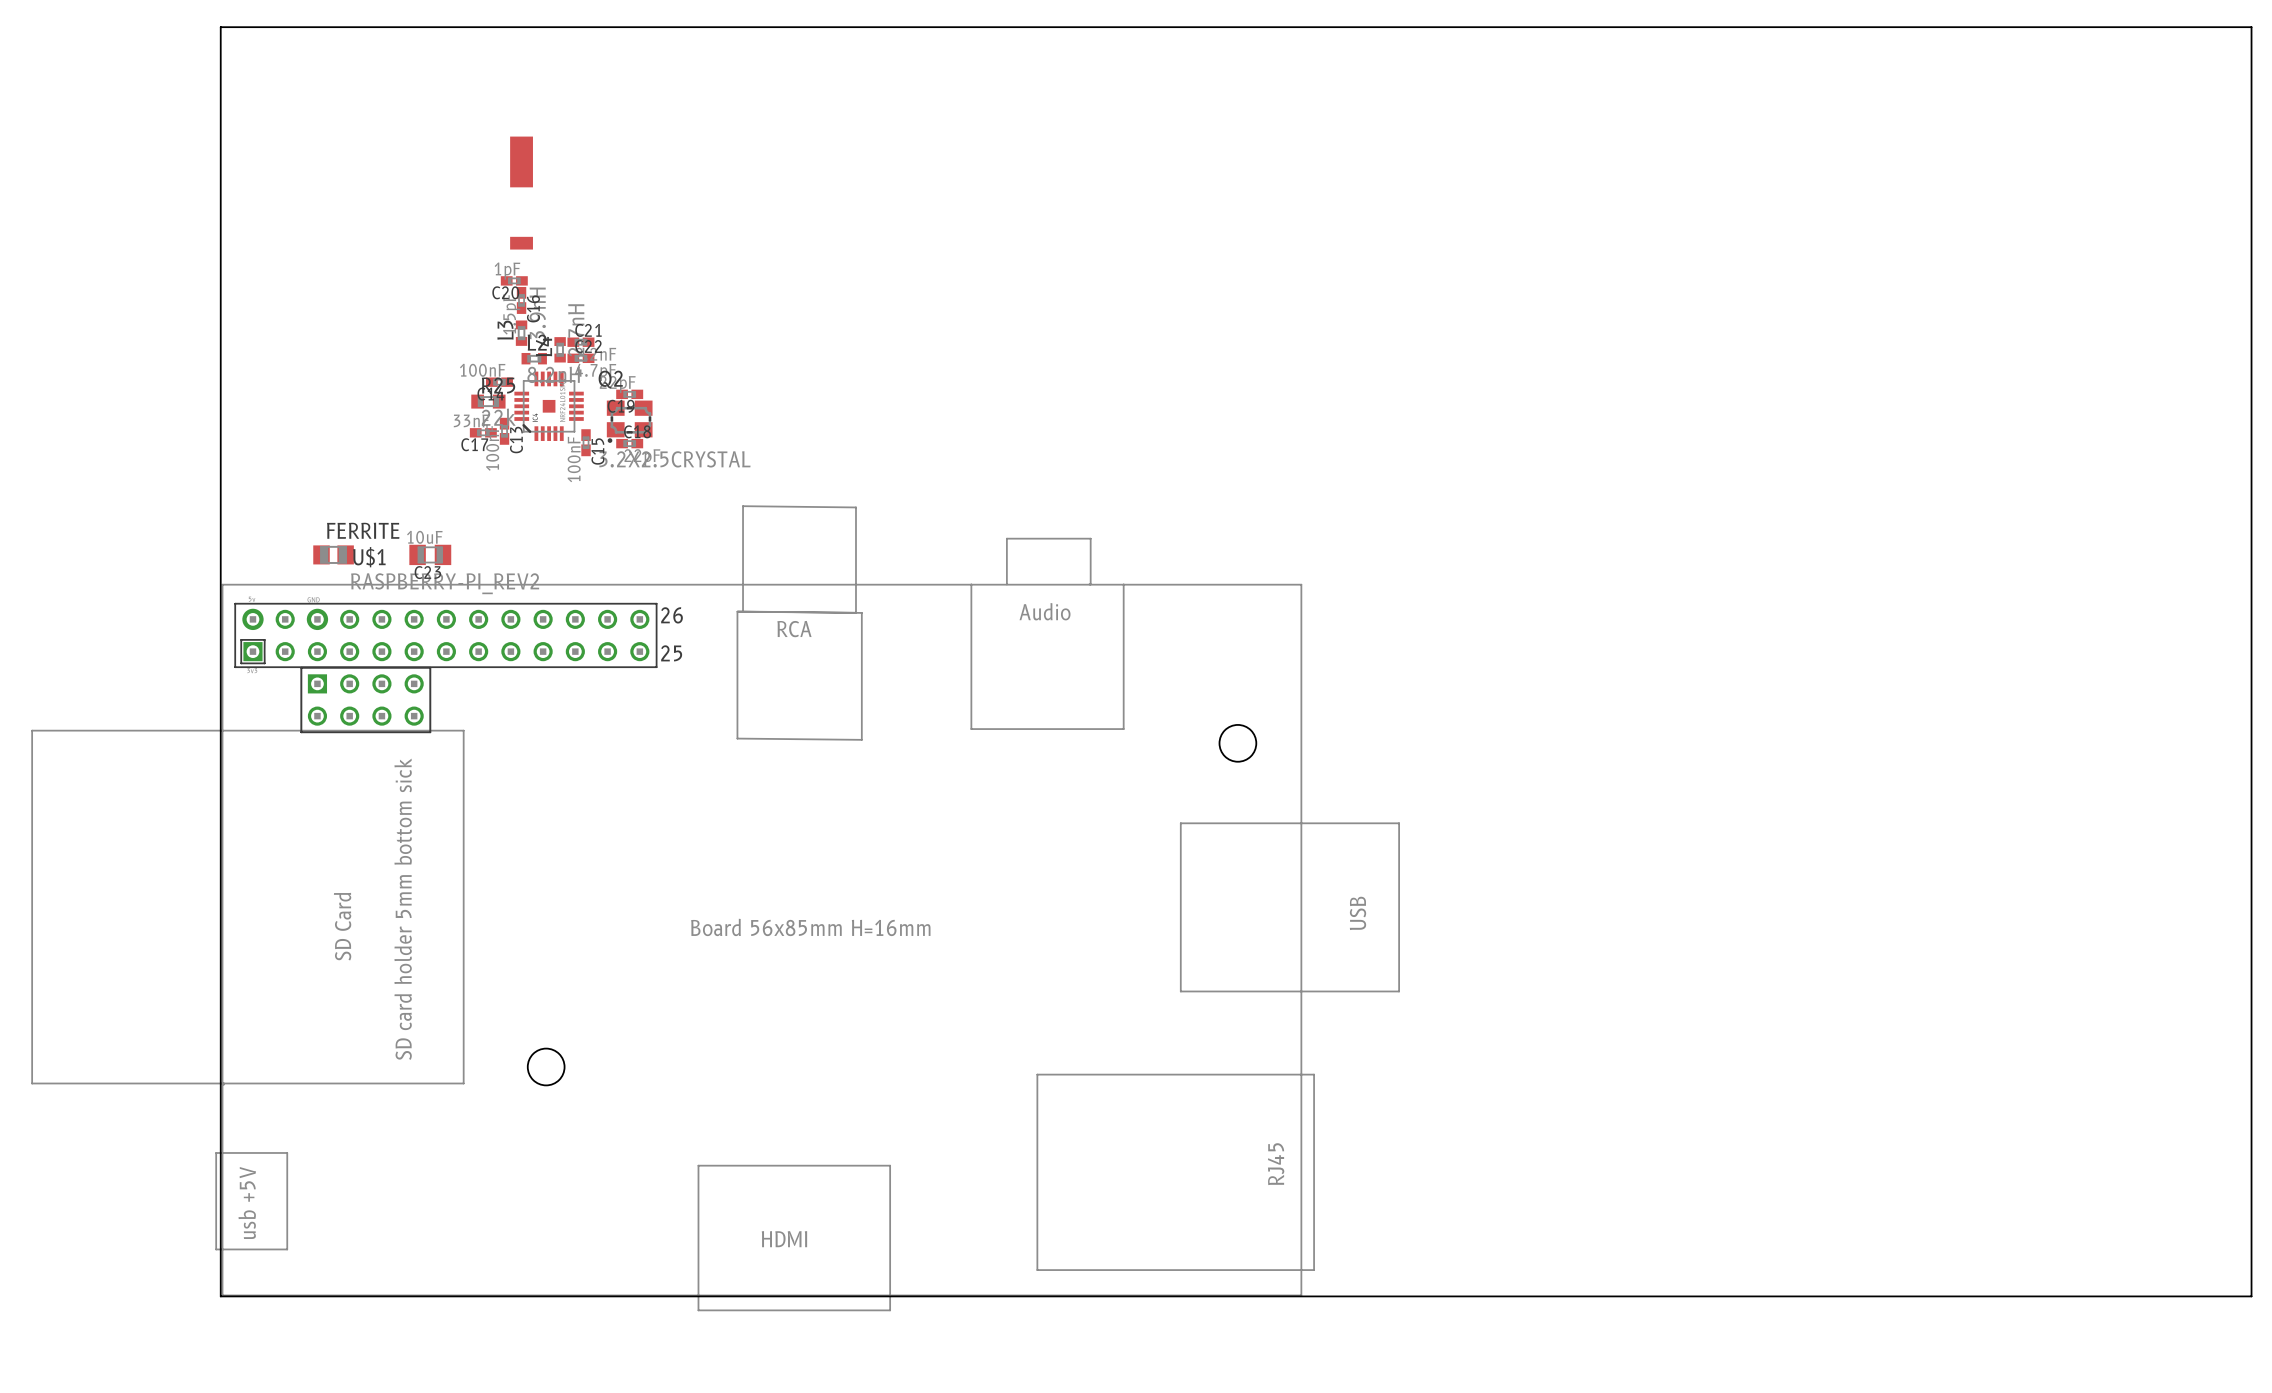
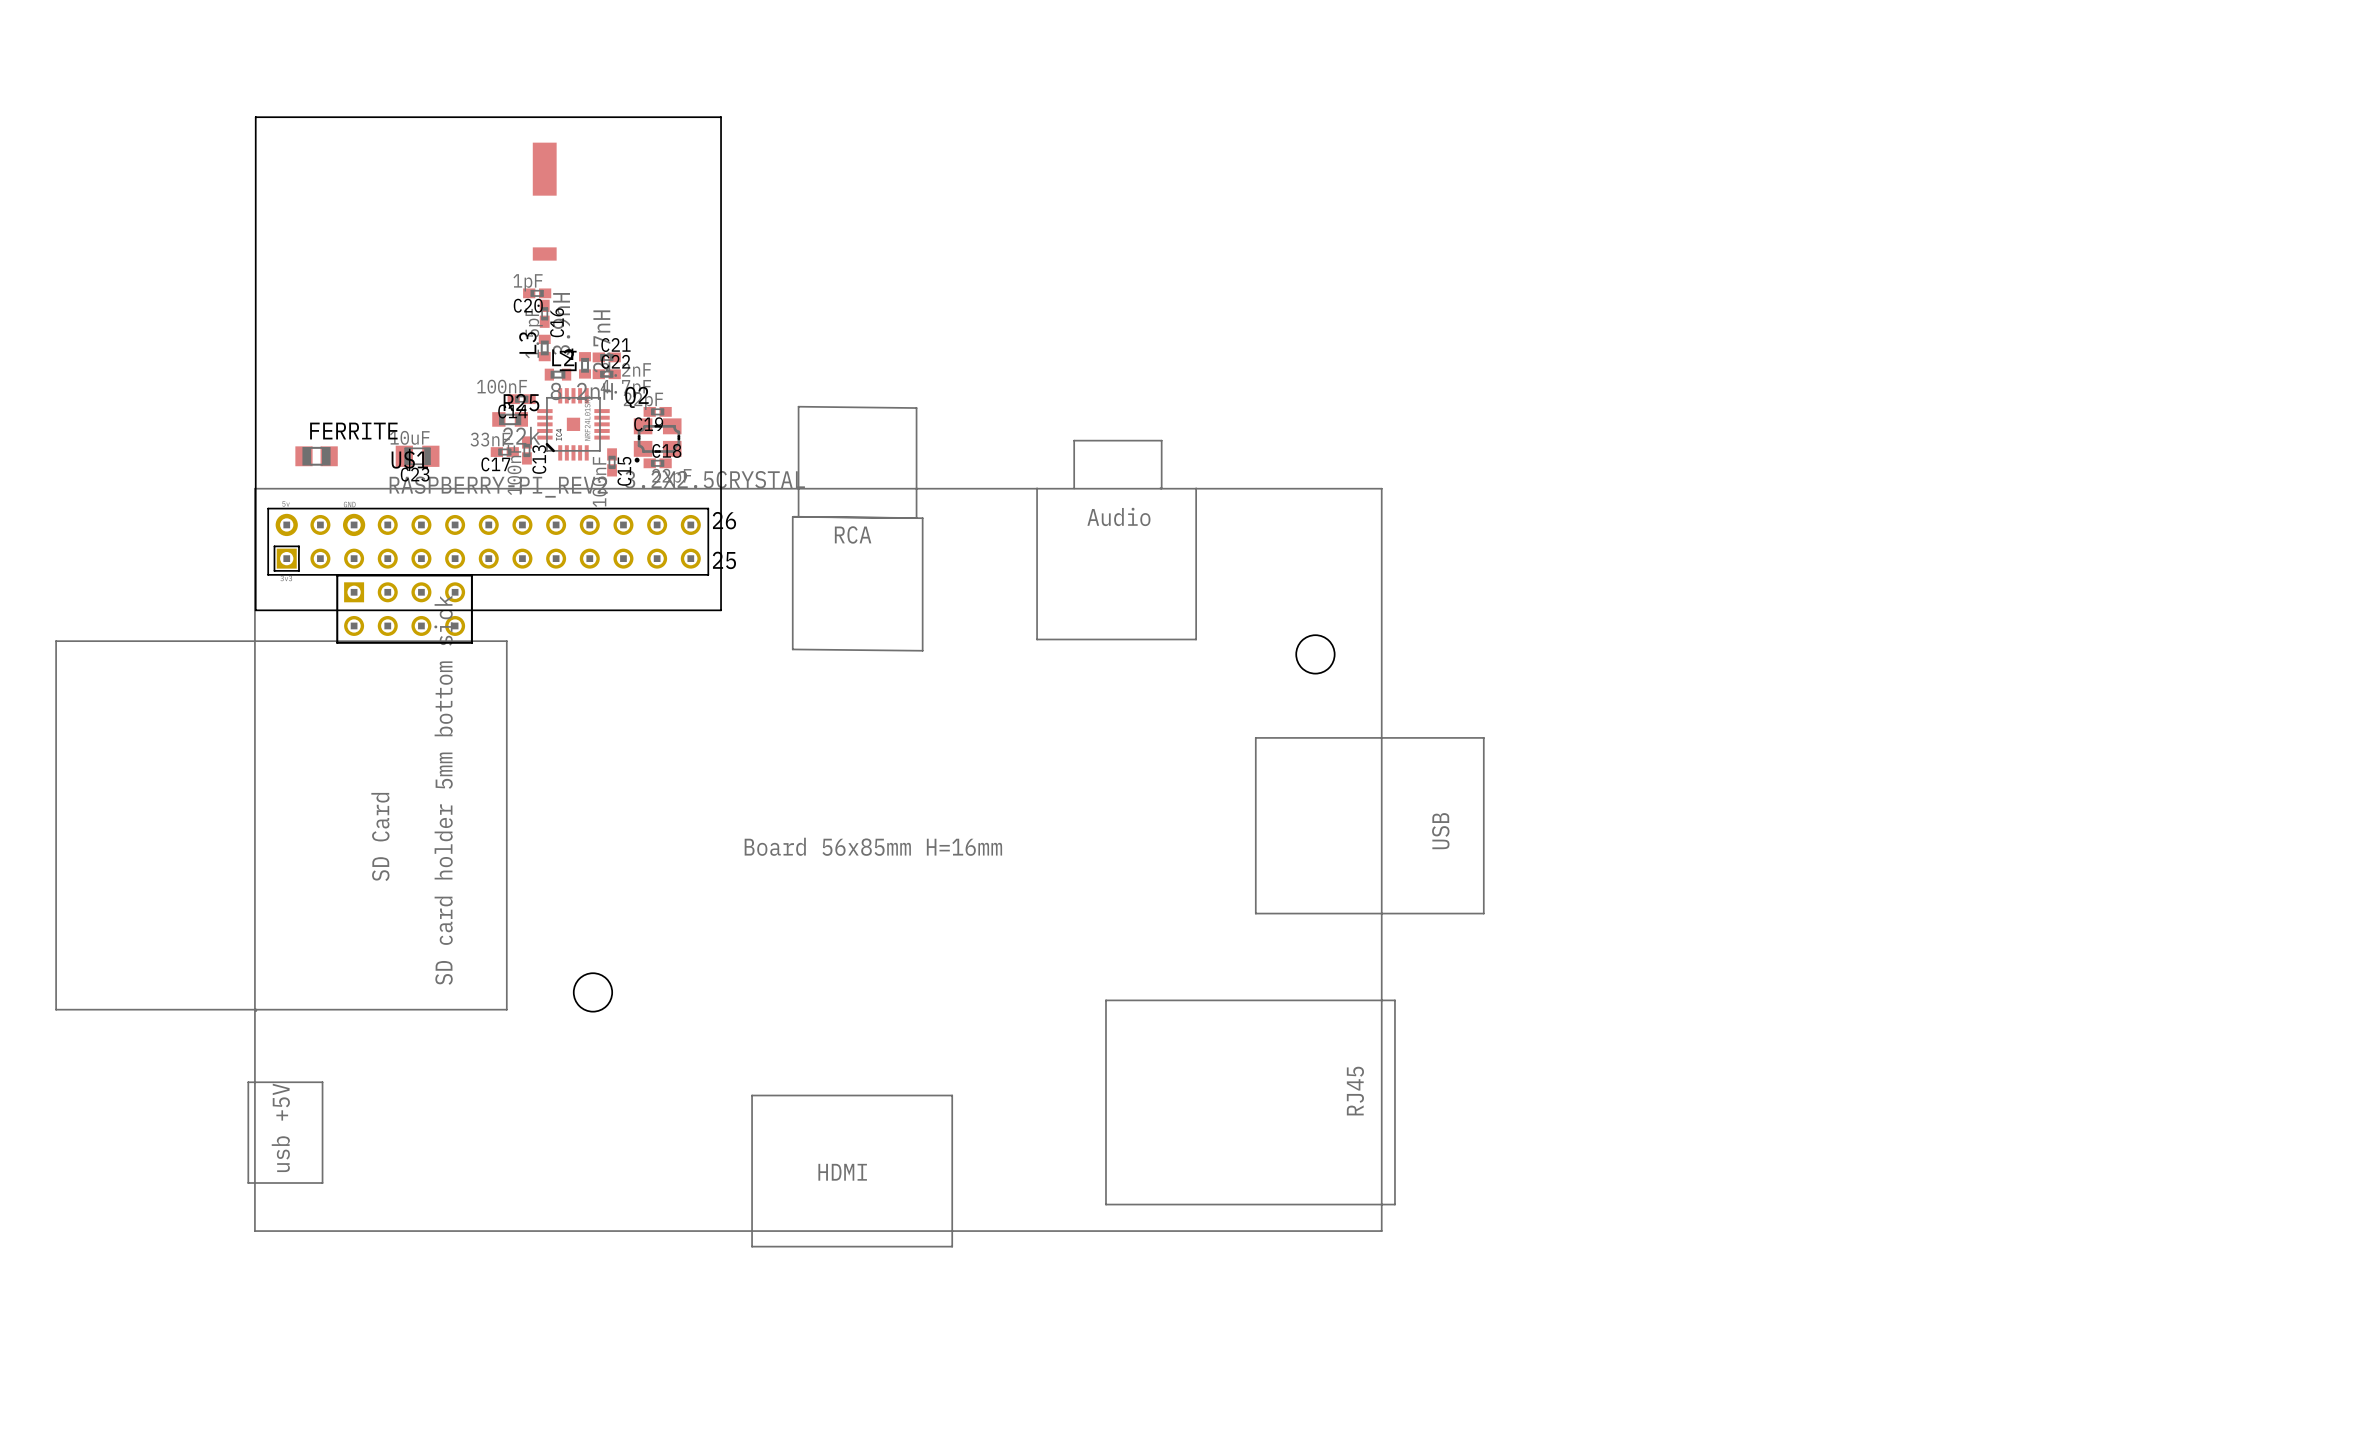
board edge: (220, 27) (2251, 27) (2251, 1296) (220, 1296) (220, 27) -> none
board edge: none -> (255, 117) (721, 117) (721, 610) (255, 610) (255, 117)
FERRITE position: (333, 554) -> (316, 456)
C23 position: (430, 554) -> (417, 456)
U$1 position: (715, 908) -> (770, 826)

